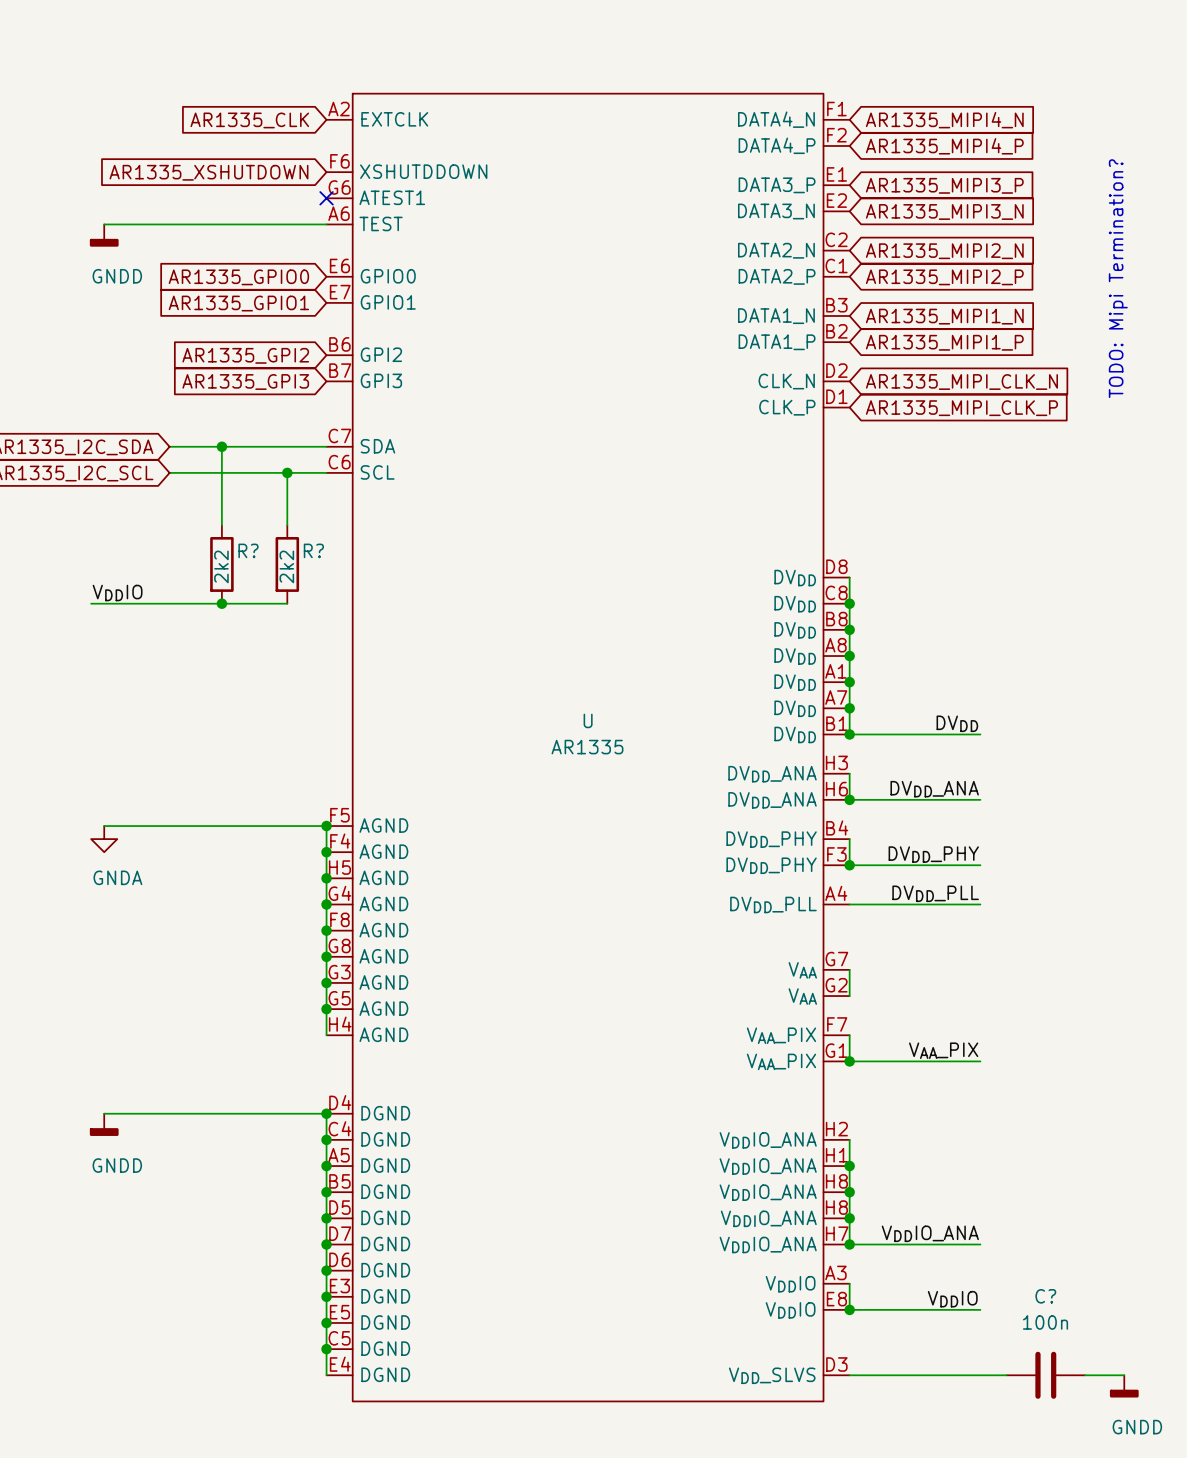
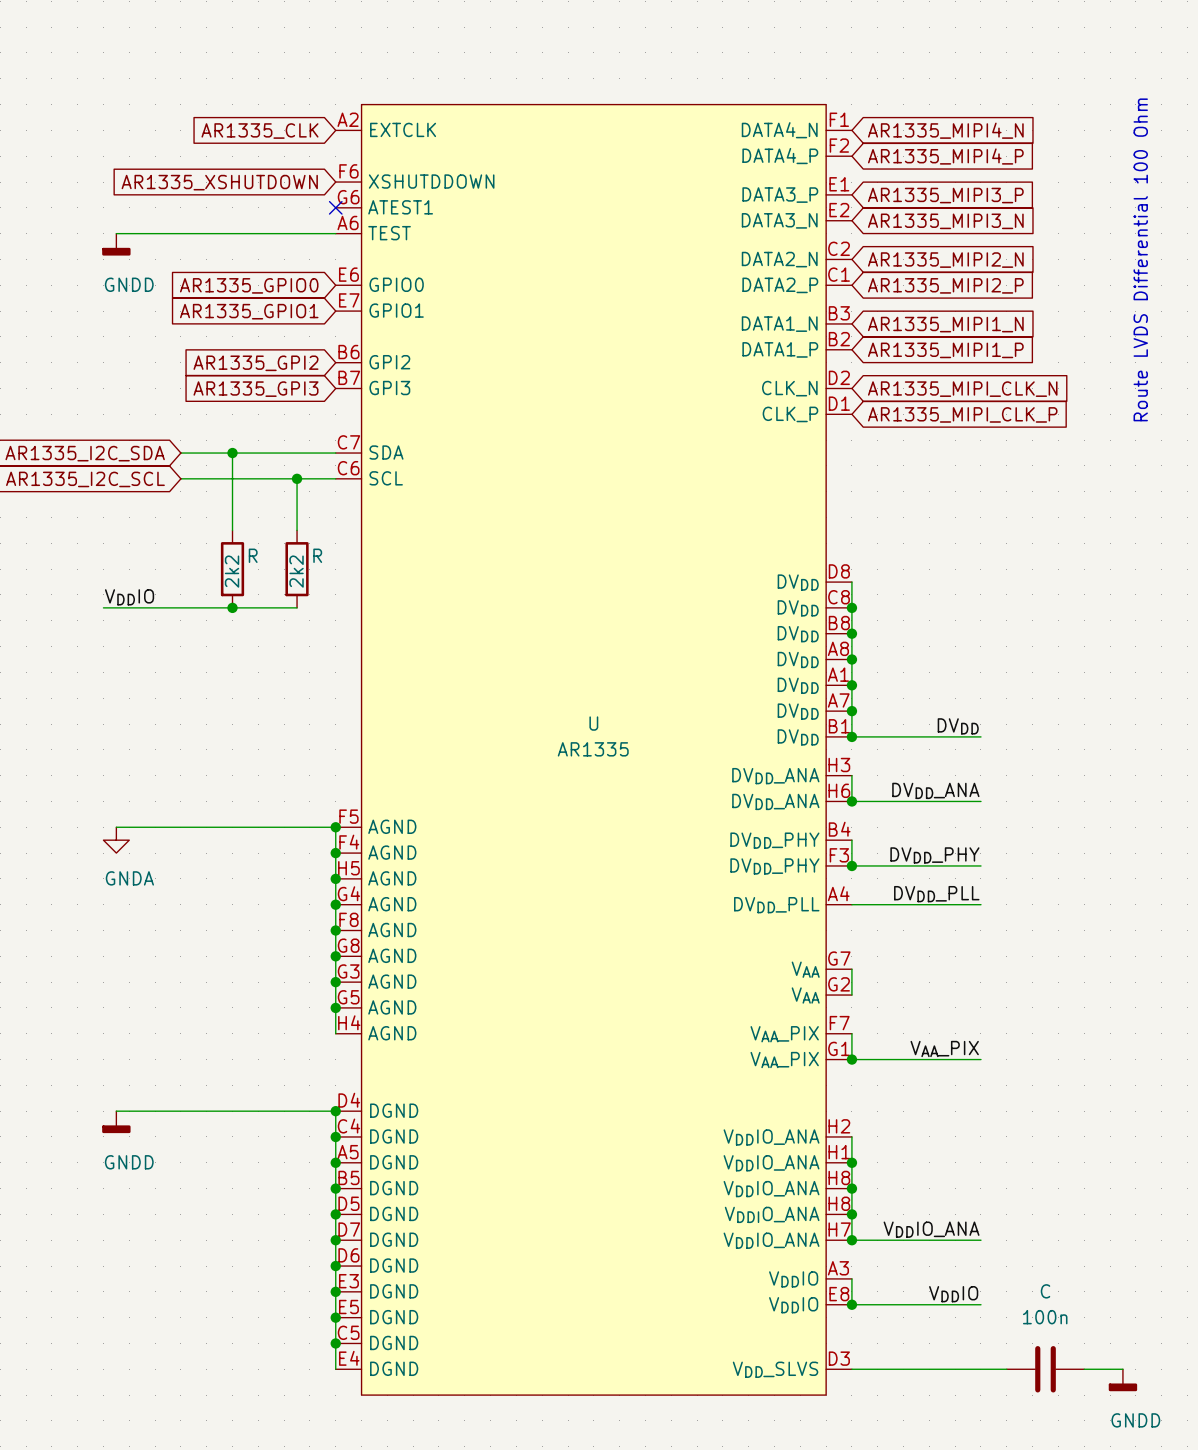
U symbol: [326, 93, 850, 1402] -> [335, 104, 852, 1396]
text: none -> Route LVDS Differential 100 Ohm (1140, 259)
text: TODO: Mipi Termination? (1118, 278) -> none
R? name: R? (248, 550) -> R (253, 555)
R? name: R? (313, 550) -> R (317, 555)
C? name: C? (1045, 1296) -> C (1045, 1291)

